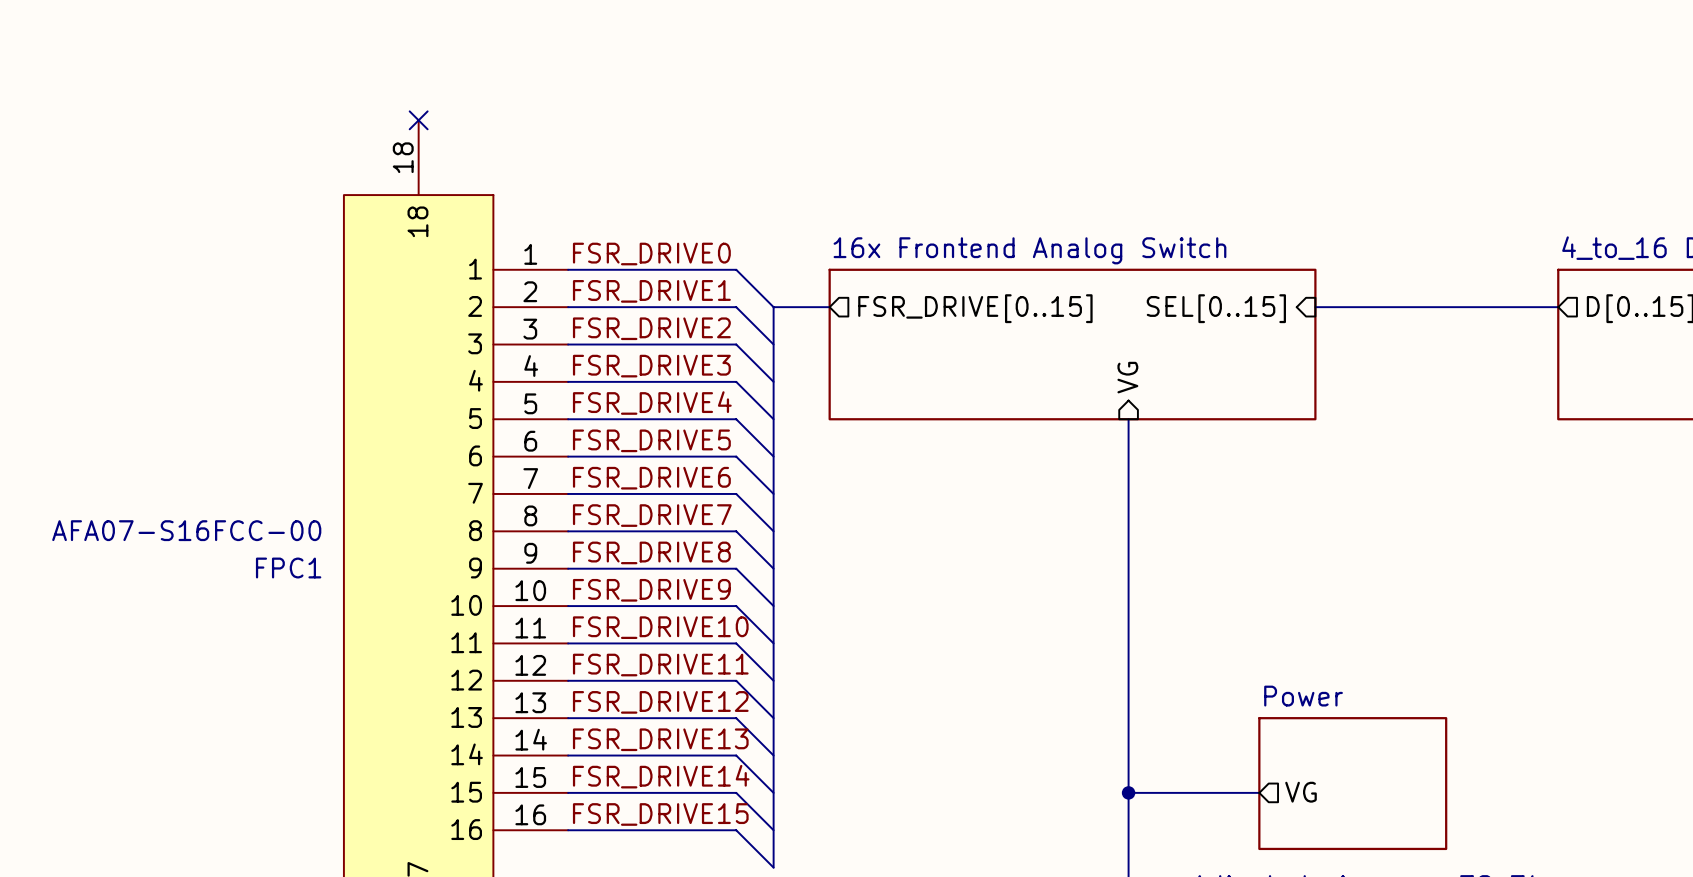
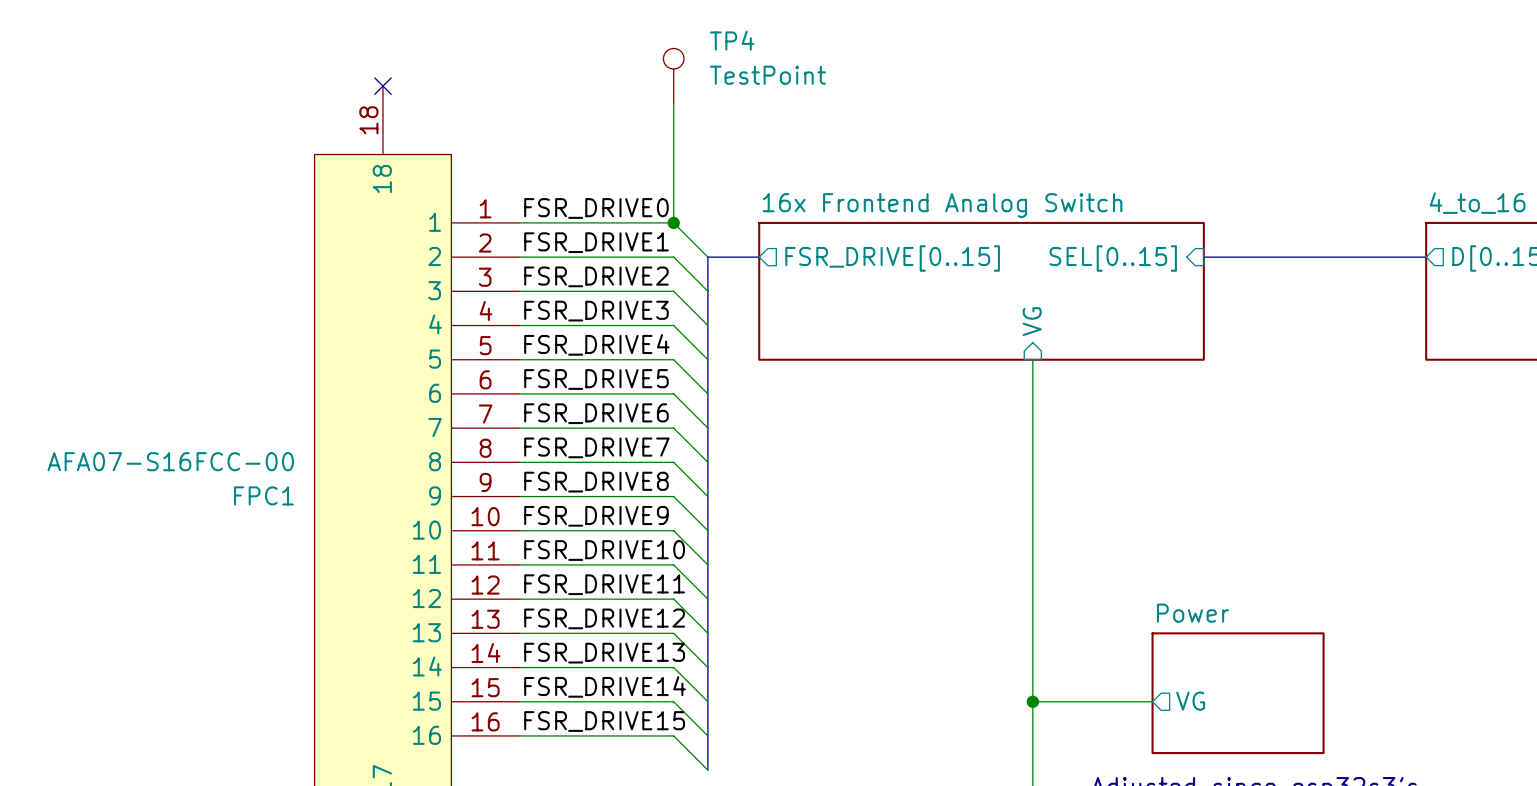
TP4: none -> TestPoint (673, 75)
wire: none -> (673, 103) (673, 222)
junction: none -> (673, 222)

